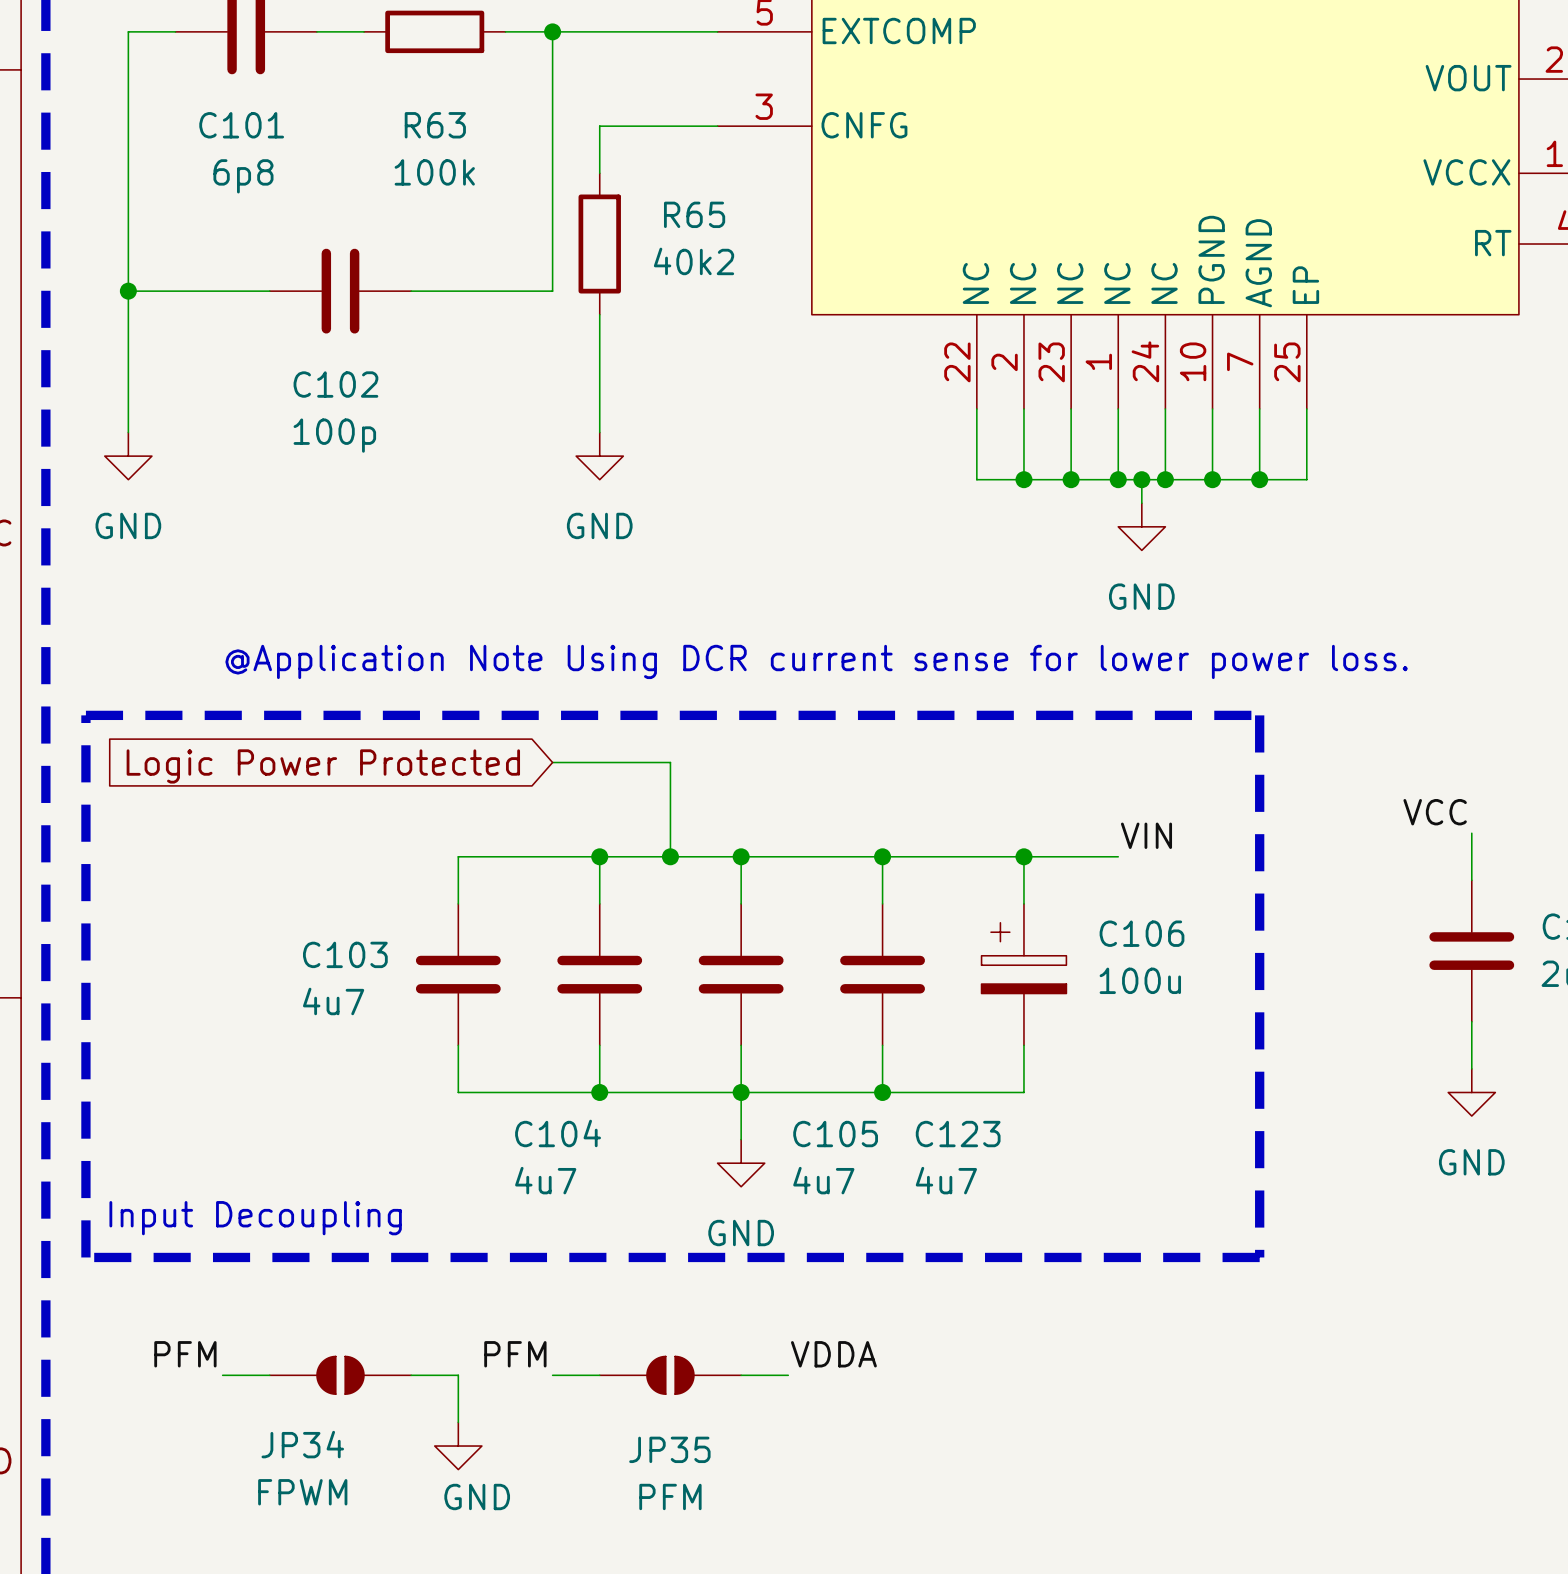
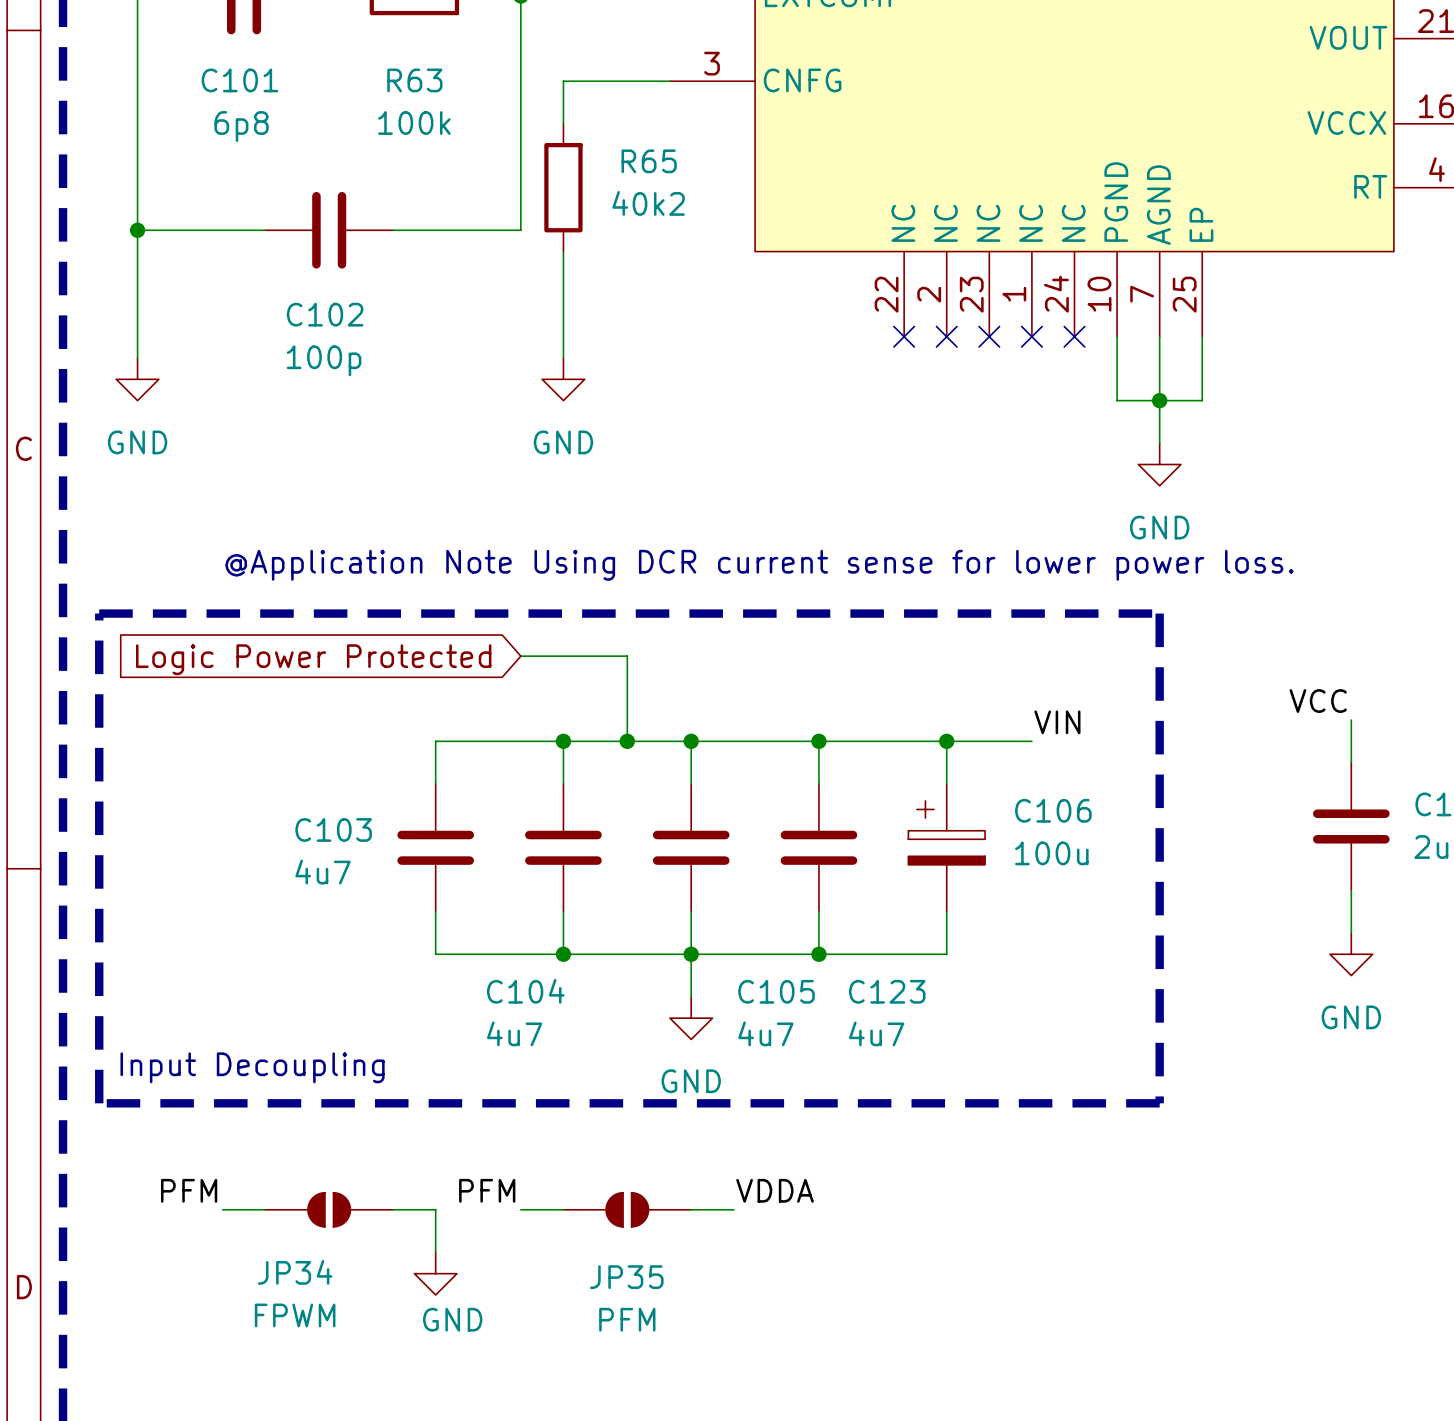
wire: (976, 408) (976, 479) (1212, 479) -> none
no-connect mark: none -> (904, 336)
wire: (1023, 408) (1023, 479) -> none
no-connect mark: none -> (946, 336)
wire: (1071, 408) (1071, 479) -> none
no-connect mark: none -> (989, 336)
wire: (1118, 408) (1118, 479) -> none
no-connect mark: none -> (1031, 336)
wire: (1165, 408) (1165, 479) -> none
no-connect mark: none -> (1074, 336)
junction: (1023, 479) -> none
junction: (1071, 479) -> none
junction: (1118, 479) -> none
wire: (1141, 479) (1141, 503) -> none
junction: (1141, 479) -> none
junction: (1165, 479) -> none
junction: (1212, 479) -> none
wire: none -> (1159, 400) (1159, 443)
power symbol position: GND (1141, 526) -> GND (1159, 464)

